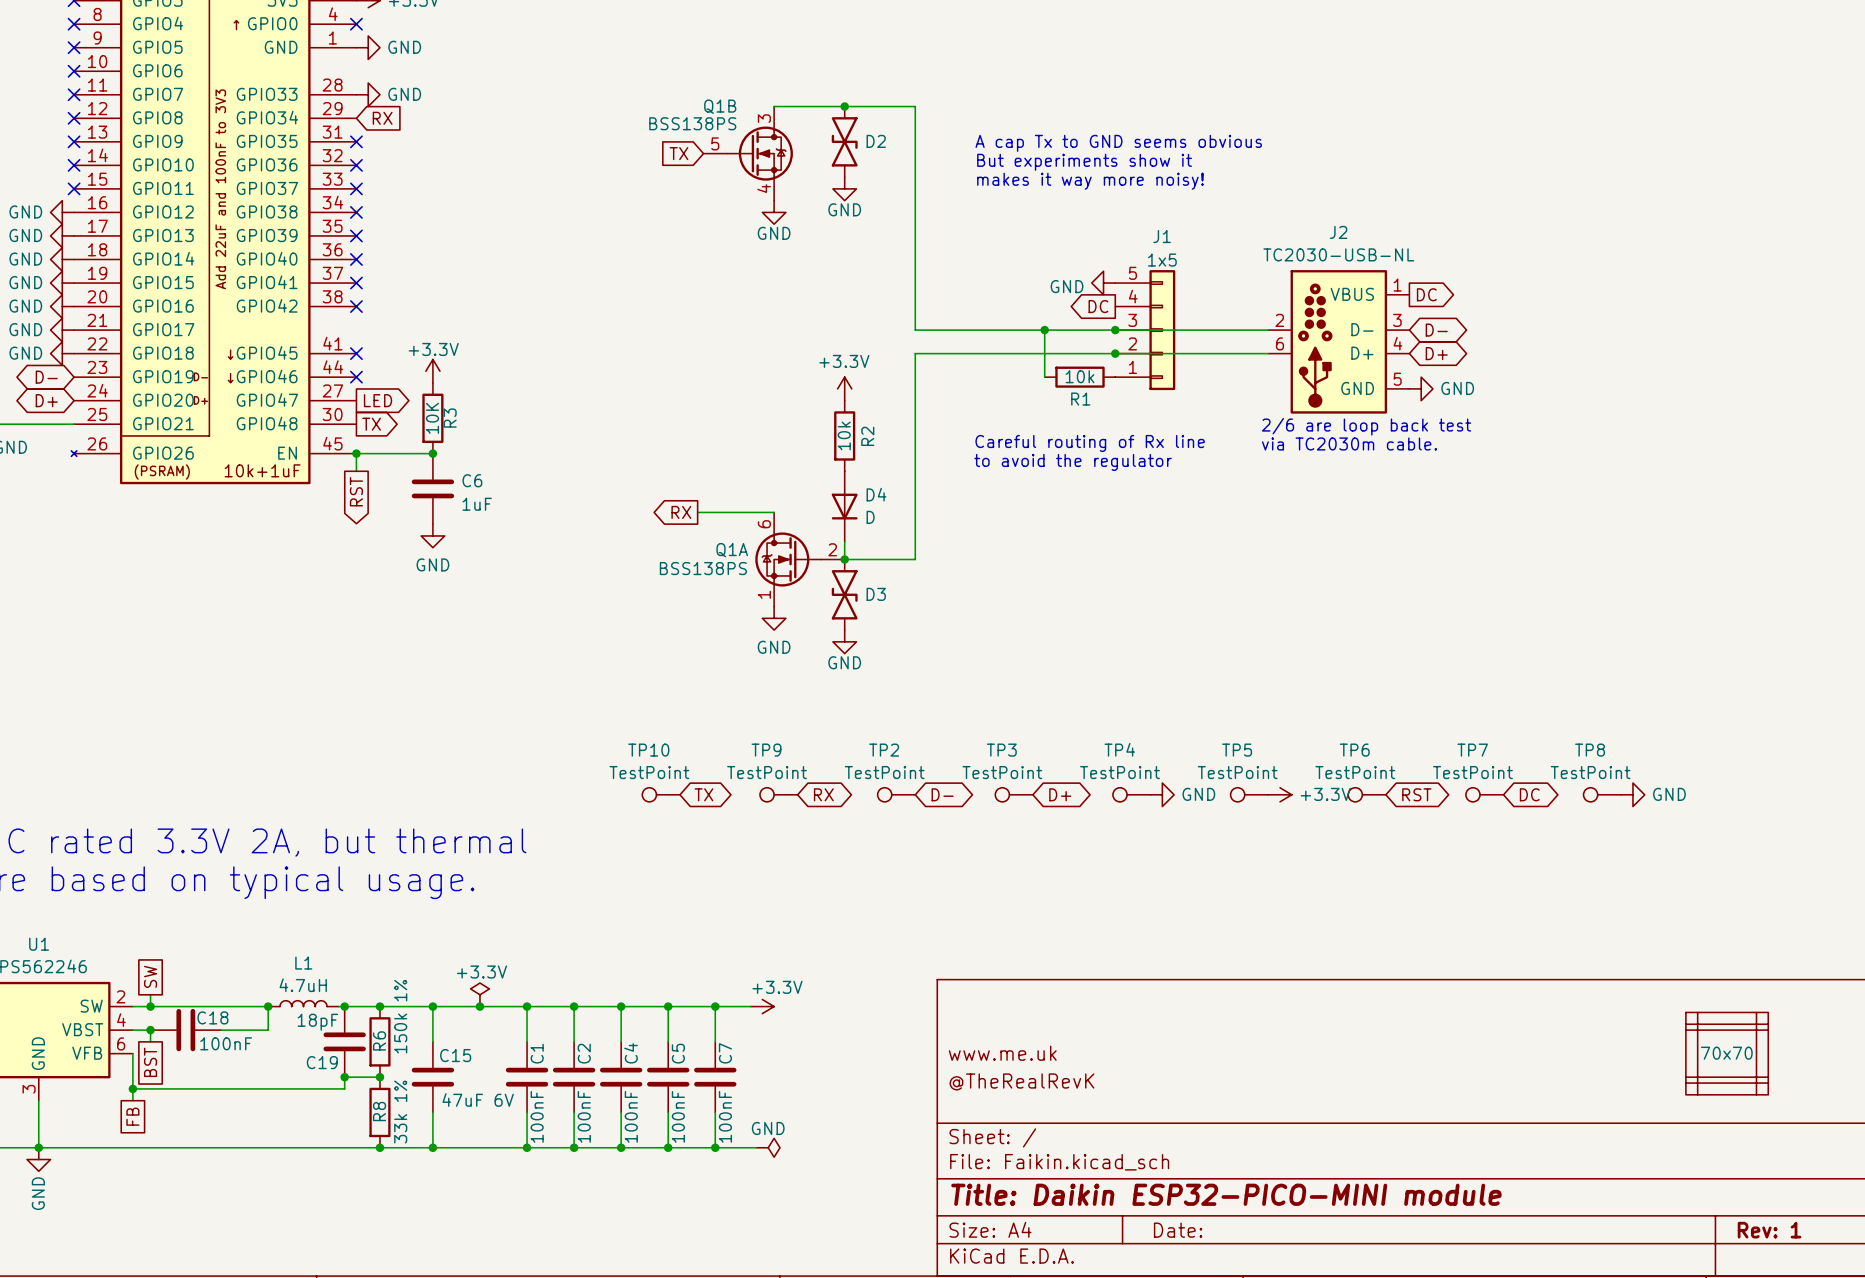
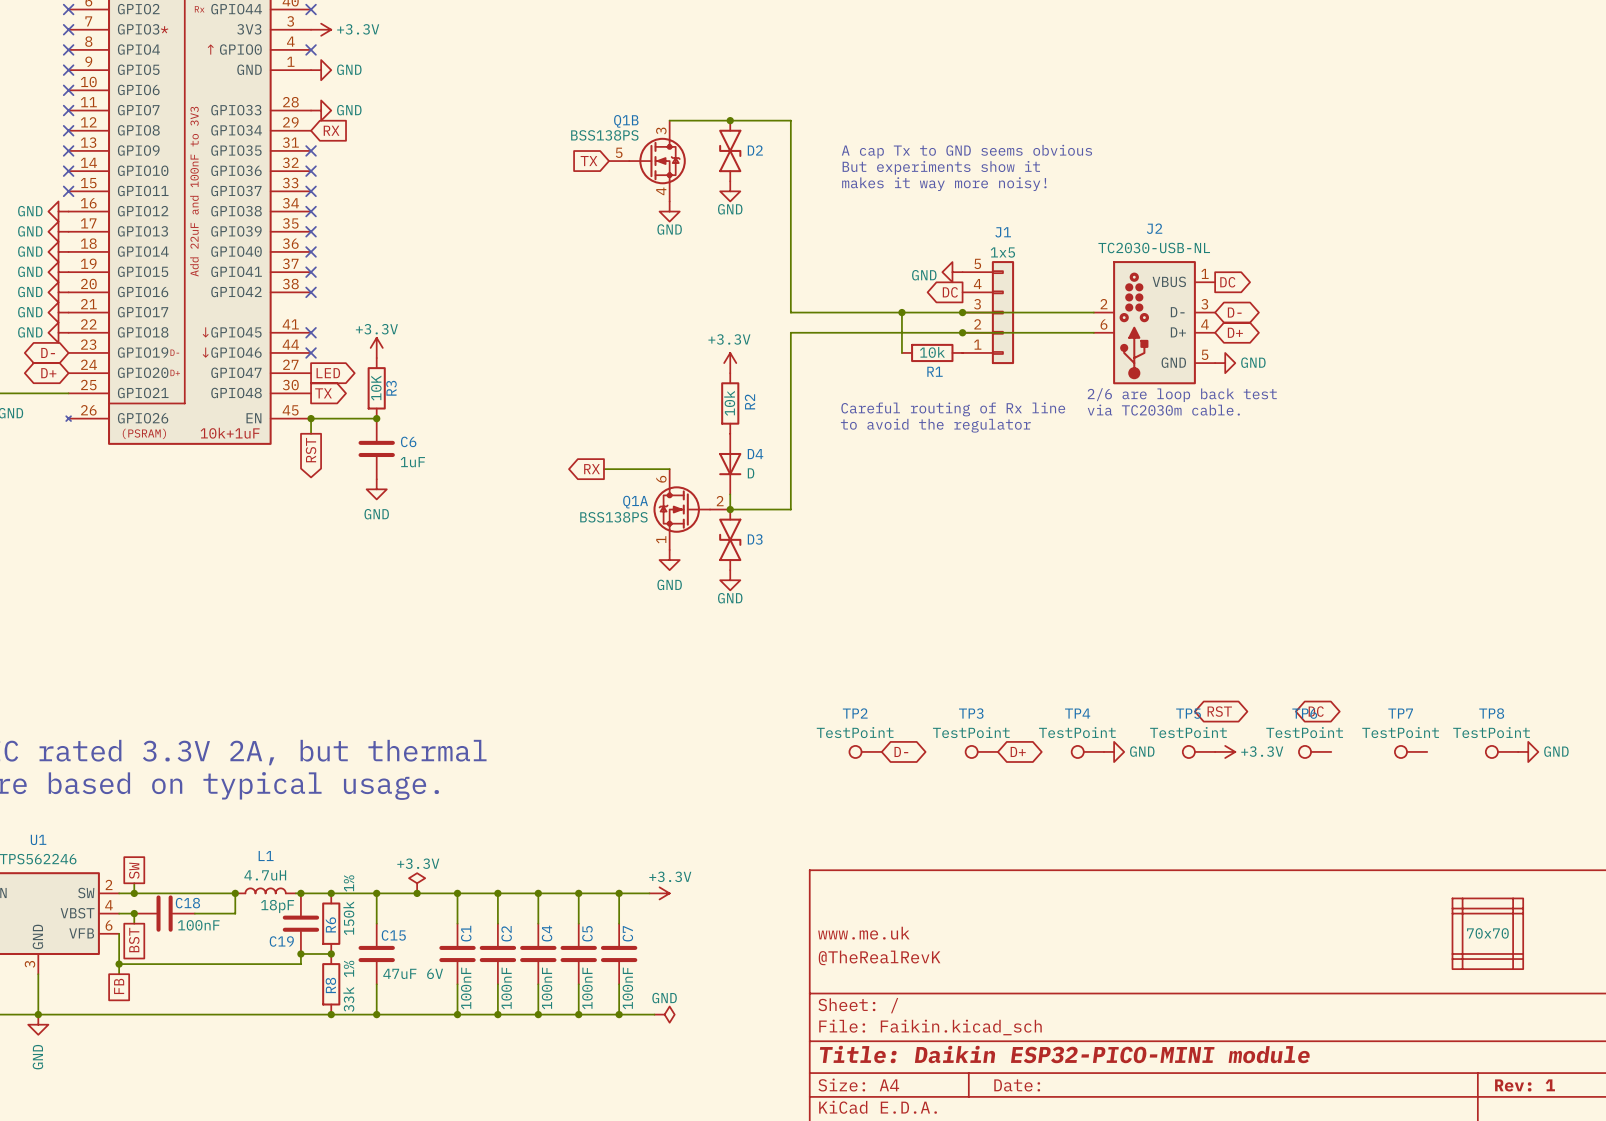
TP10: TestPoint (661, 794) -> none
global label: TX (703, 794) -> none
TP9: TestPoint (778, 794) -> none
global label: RX (823, 794) -> none
TP2 position: (896, 794) -> (865, 751)
global label position: D- (942, 794) -> D- (901, 751)
TP3 position: (1014, 794) -> (981, 751)
global label position: D+ (1060, 794) -> D+ (1018, 751)
TP4 position: (1131, 794) -> (1087, 751)
power symbol position: GND (1162, 794) -> GND (1114, 751)
TP5 position: (1249, 794) -> (1198, 751)
power symbol position: +3.3V (1280, 794) -> +3.3V (1225, 751)
TP6 position: (1367, 794) -> (1315, 751)
TP7 position: (1484, 794) -> (1411, 751)
TP8 position: (1602, 794) -> (1501, 751)
power symbol position: GND (1632, 794) -> GND (1528, 751)

